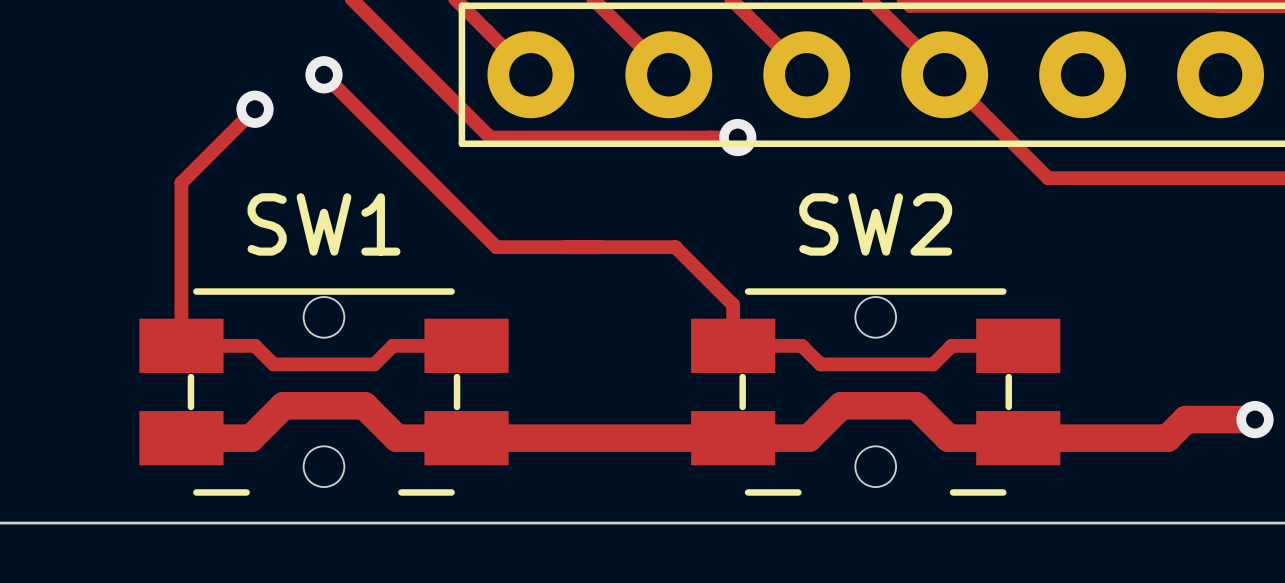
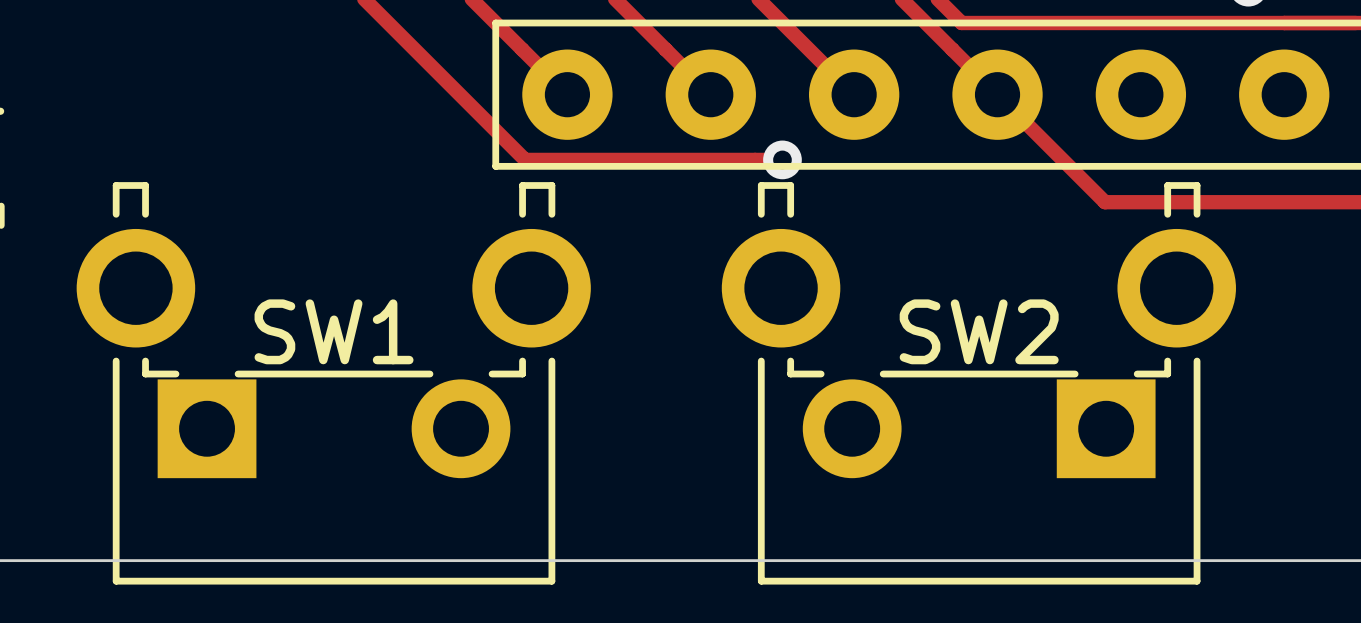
track: (323, 74) (496, 247) (675, 247) (733, 304) (733, 345) (801, 345) (820, 364) (933, 364) (951, 345) (1018, 345) -> none
via: (323, 74) -> none
track: (255, 109) (181, 182) (181, 345) (255, 345) (273, 364) (374, 364) (392, 345) (466, 345) -> none
via: (255, 109) -> none
SW1 name position: SW1 (323, 224) -> SW1 (334, 331)
SW2 name position: SW2 (875, 224) -> SW2 (979, 331)
SW1 footprint: [139, 288, 509, 496] -> [76, 182, 591, 585]
SW2 footprint: [691, 288, 1061, 496] -> [721, 182, 1236, 585]
track: (1255, 419) (1186, 419) (1167, 438) (948, 438) (916, 405) (841, 405) (808, 438) (396, 438) (364, 405) (283, 405) (251, 438) (181, 438) -> none
via: (1255, 419) -> none

